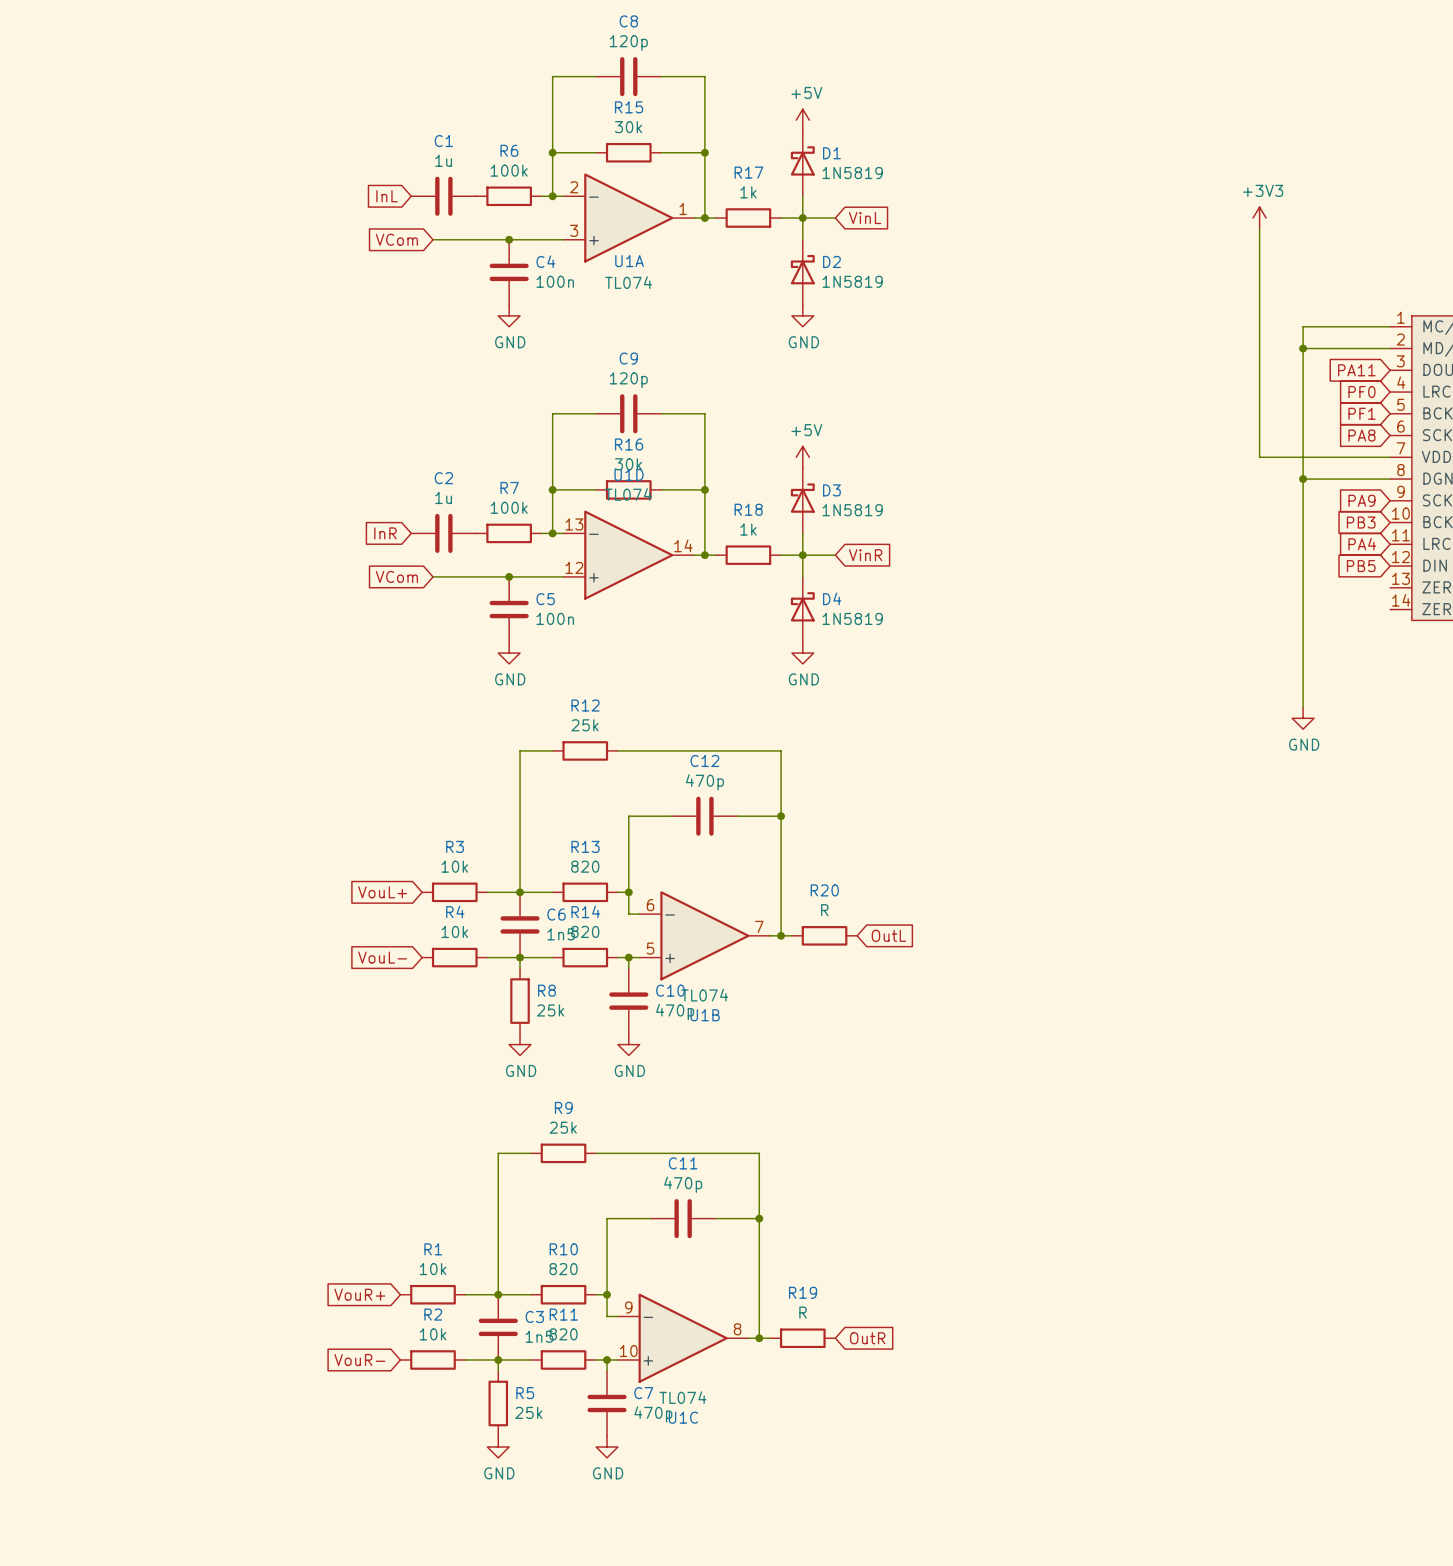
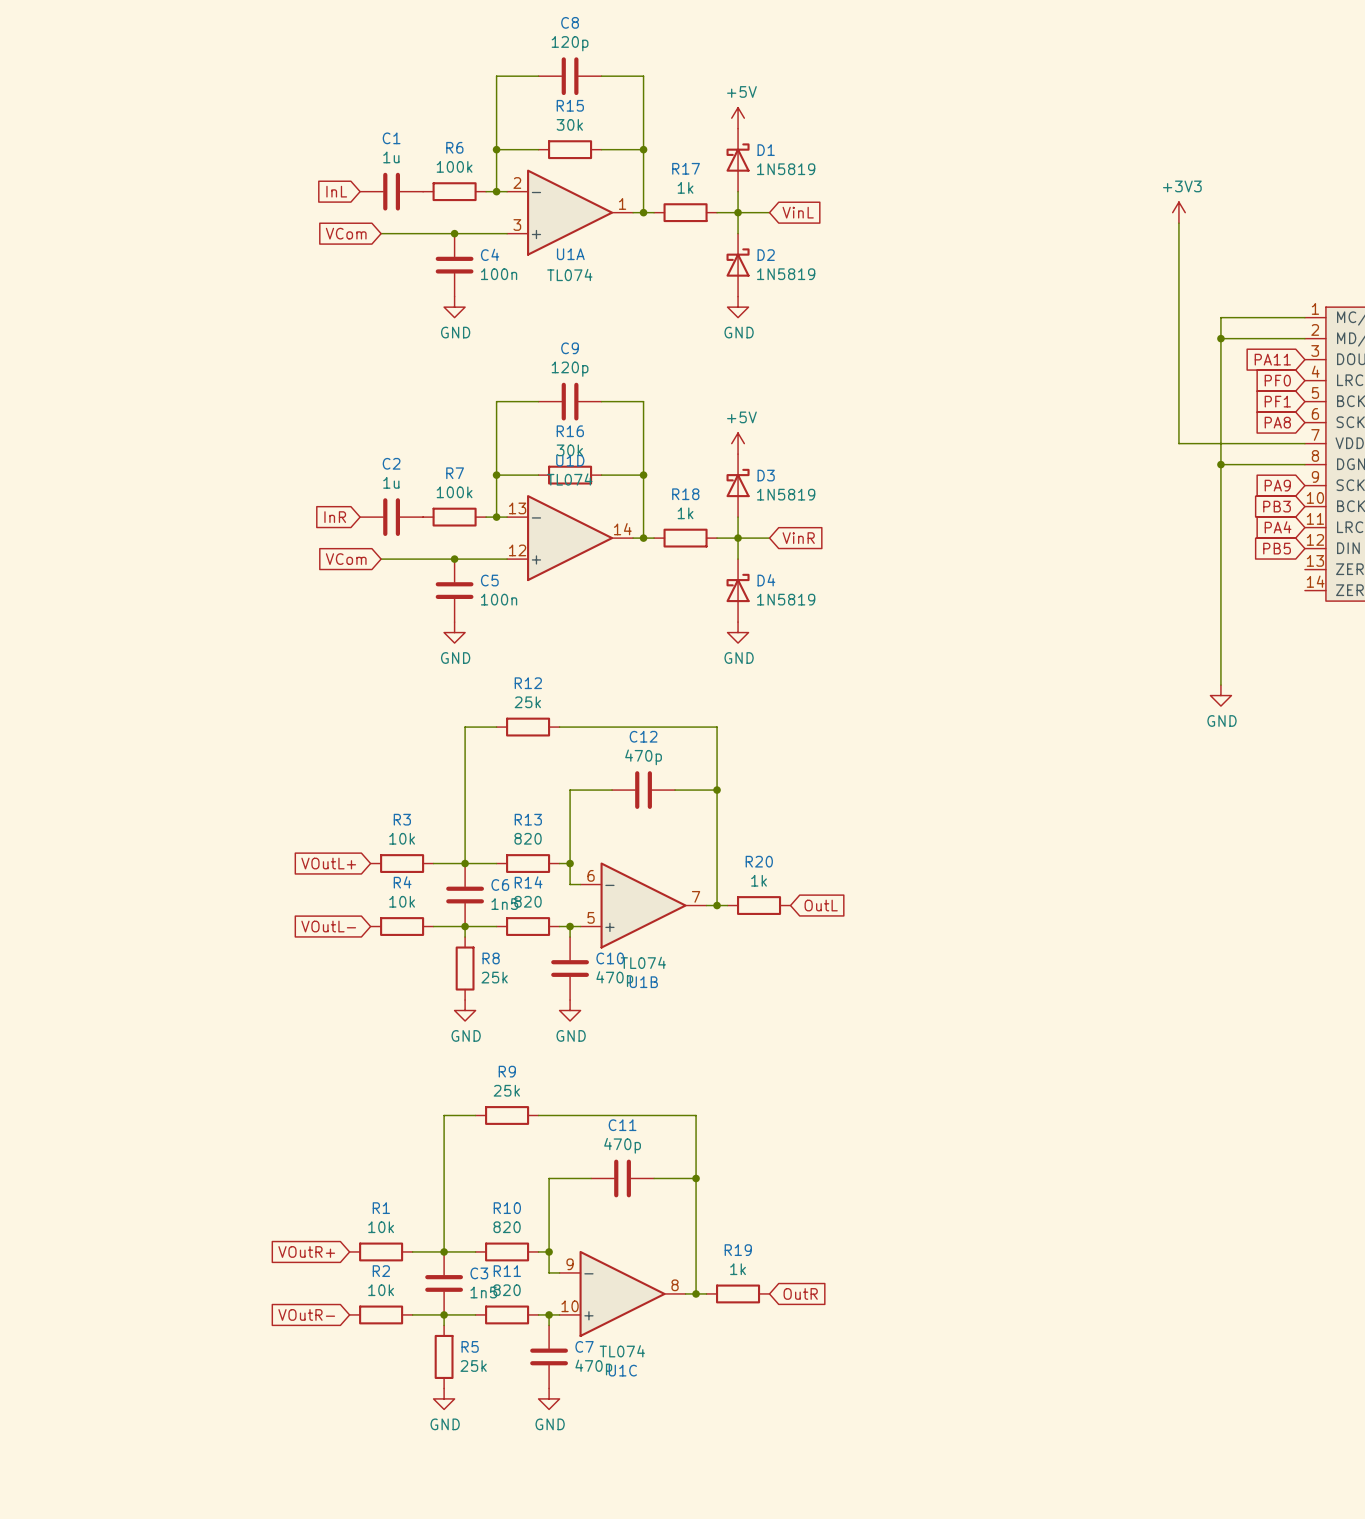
global label: VouL+ (382, 892) -> VOutL+ (328, 863)
R20 value: R (824, 910) -> 1k (759, 880)
global label: VouL- (382, 957) -> VOutL- (328, 926)
global label: VouR+ (359, 1294) -> VOutR+ (306, 1251)
R19 value: R (803, 1312) -> 1k (738, 1269)
global label: VouR- (359, 1359) -> VOutR- (306, 1314)

